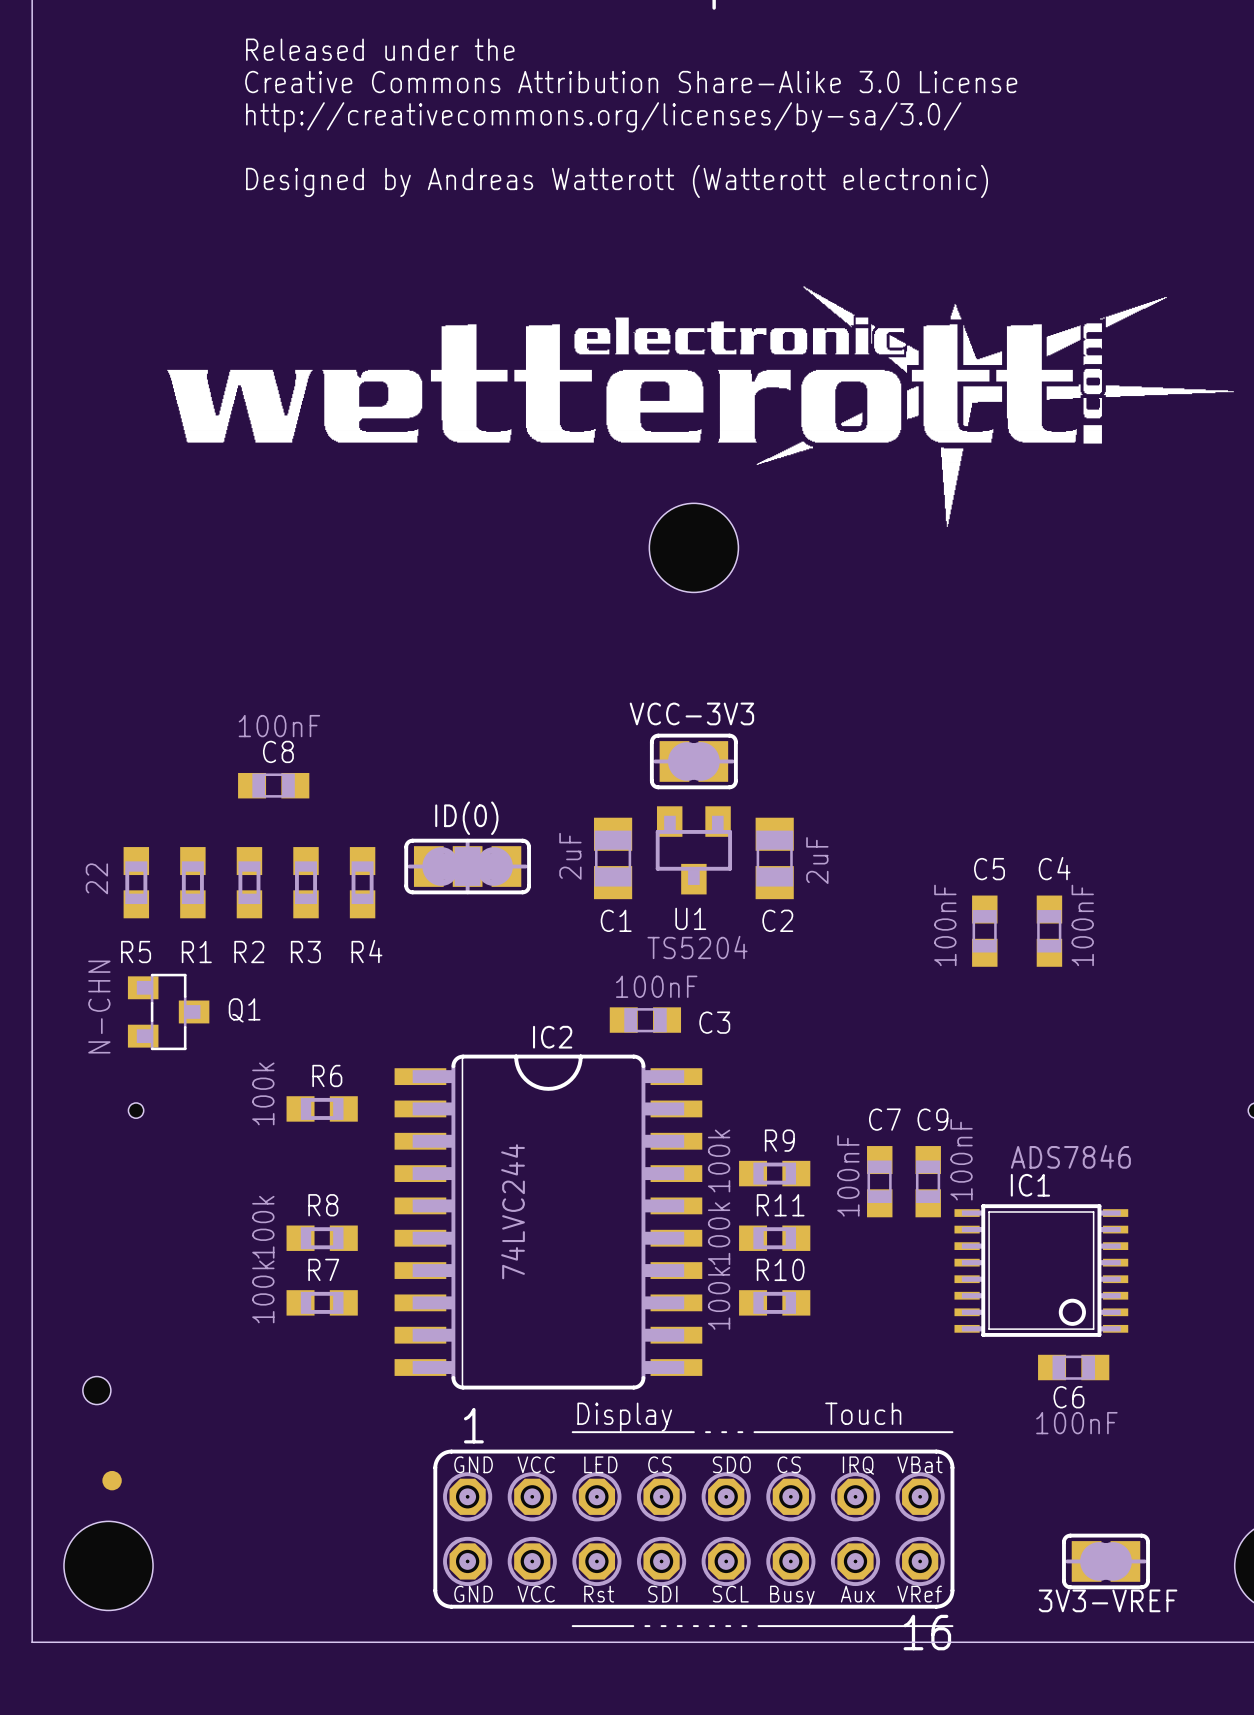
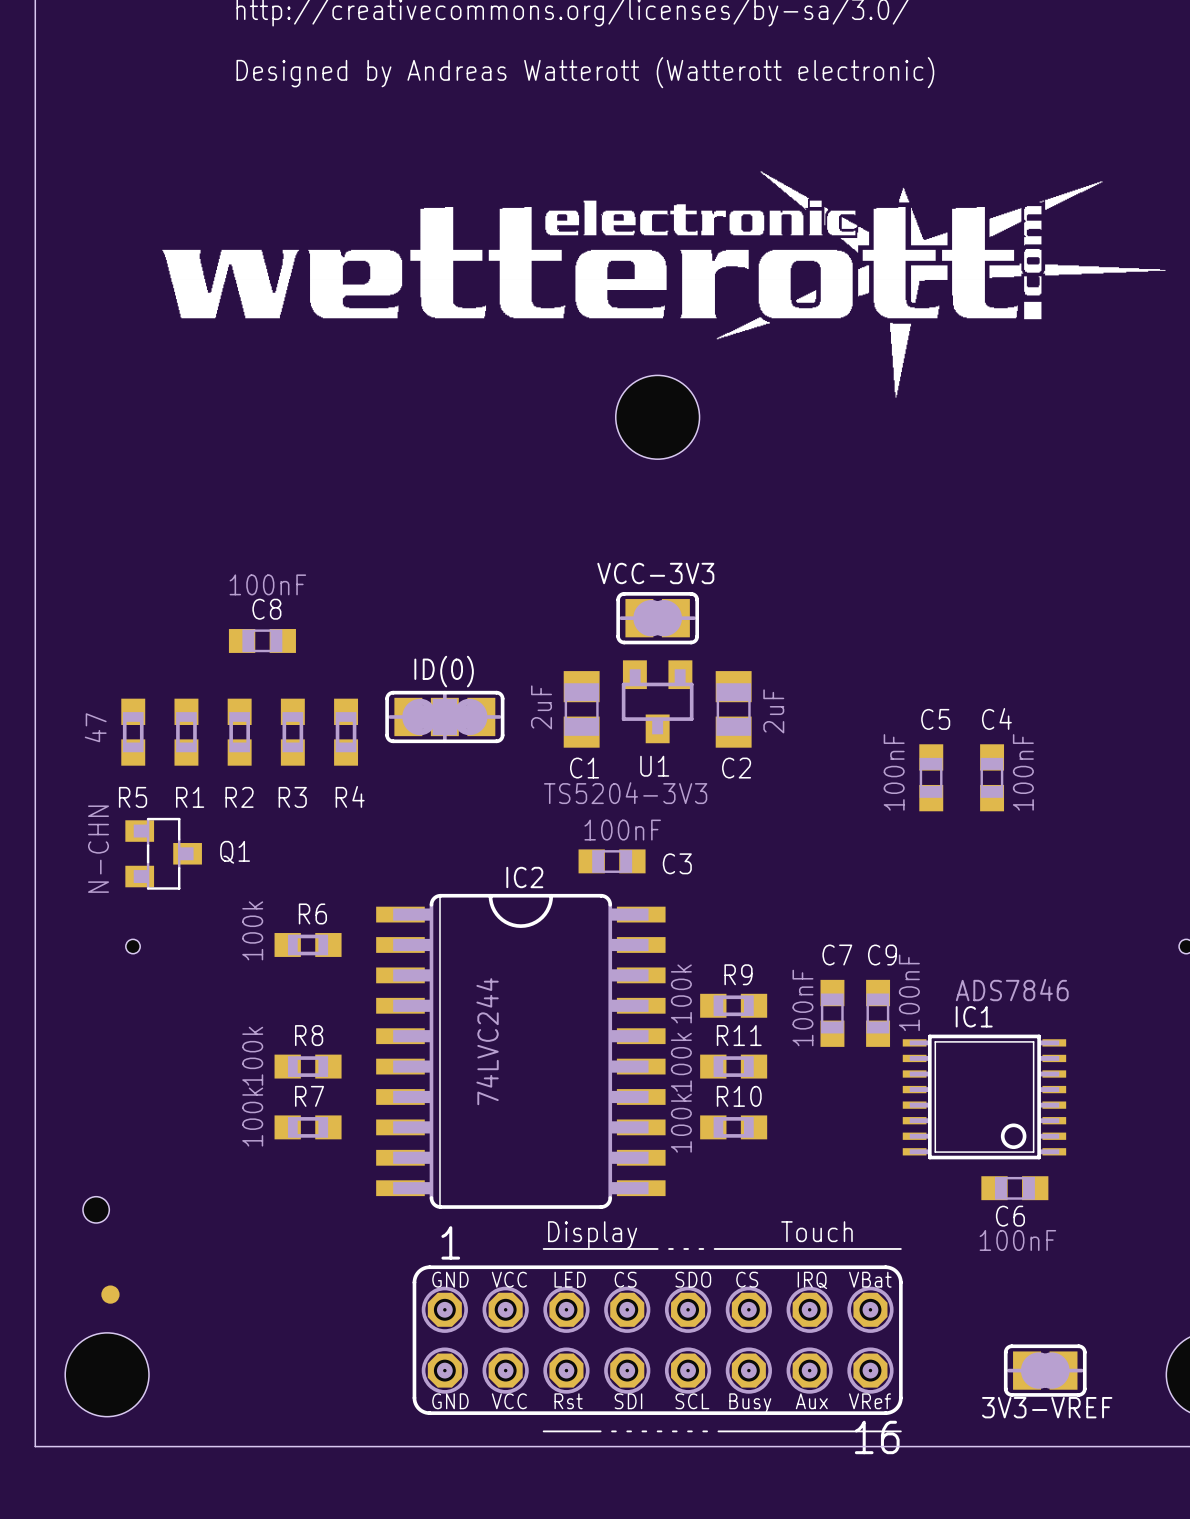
R5 value: 22 (96, 878) -> 47 (95, 727)
U1 value: TS5204 (697, 947) -> TS5204-3V3 (625, 793)

